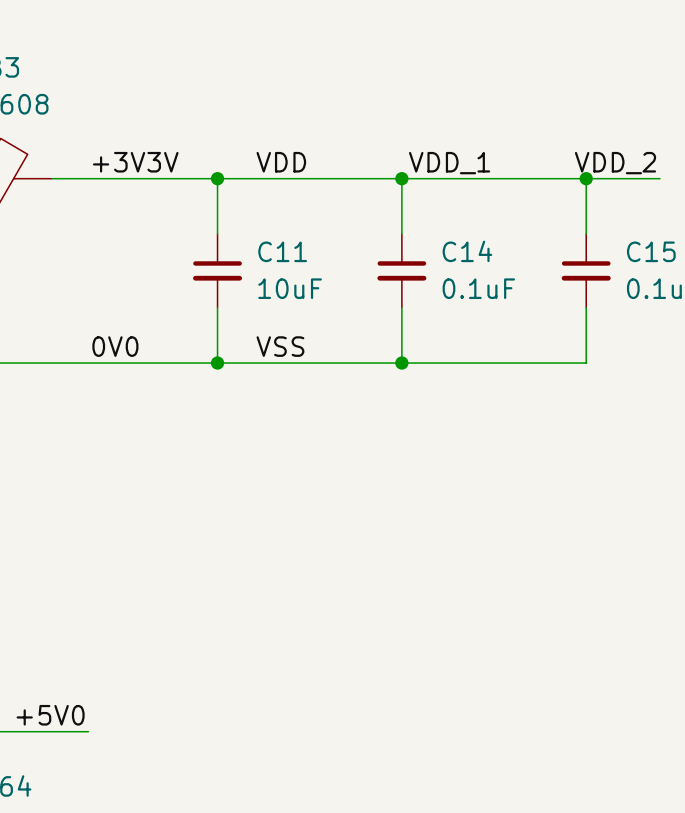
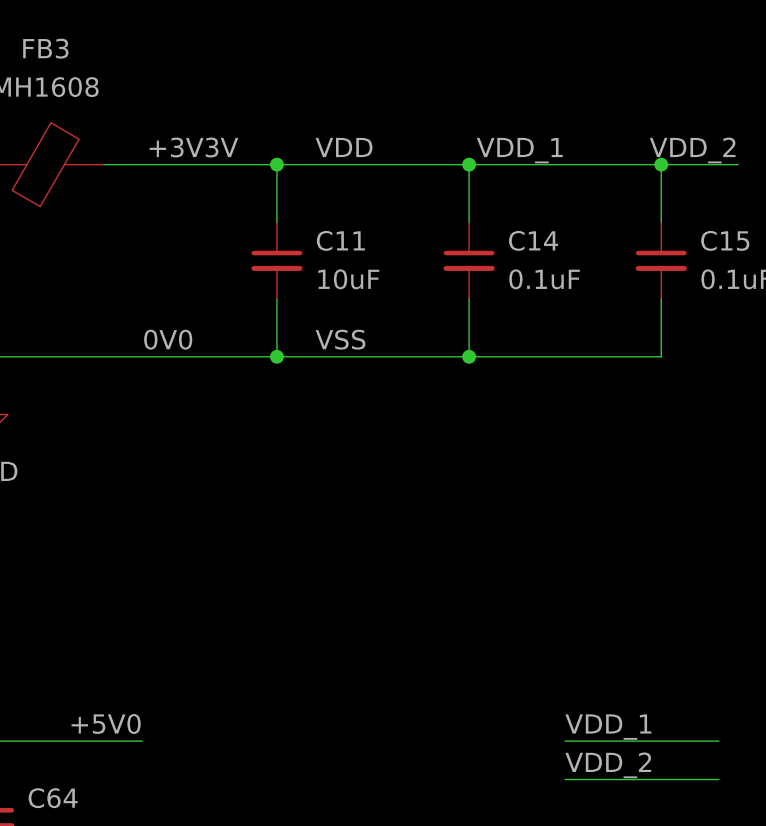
label: none -> VDD_1 (608, 727)
wire: none -> (565, 741) (718, 741)
label: none -> VDD_2 (608, 765)
wire: none -> (565, 779) (718, 779)

